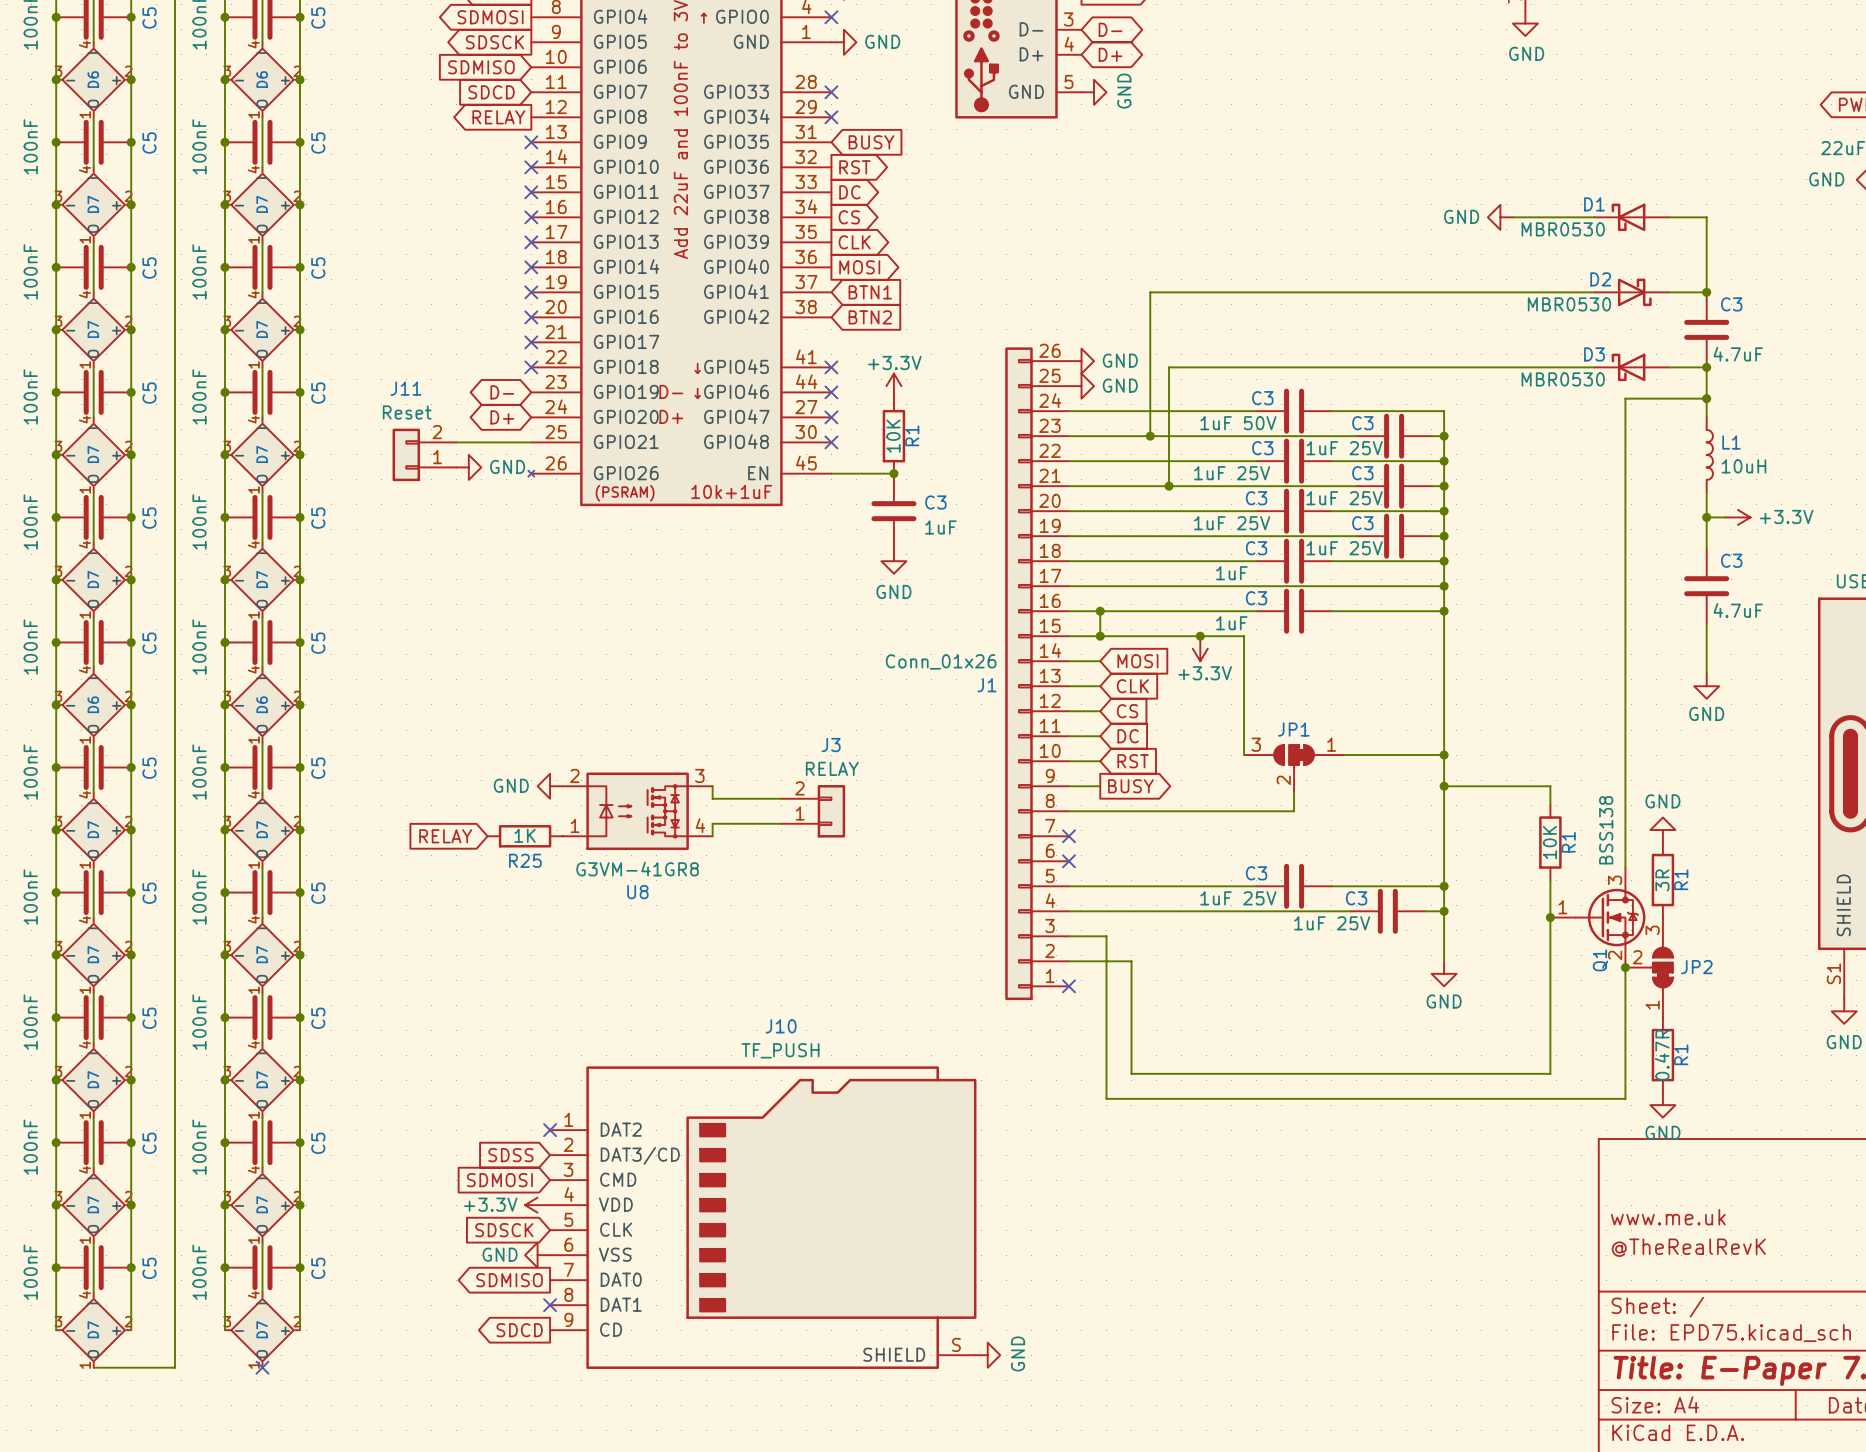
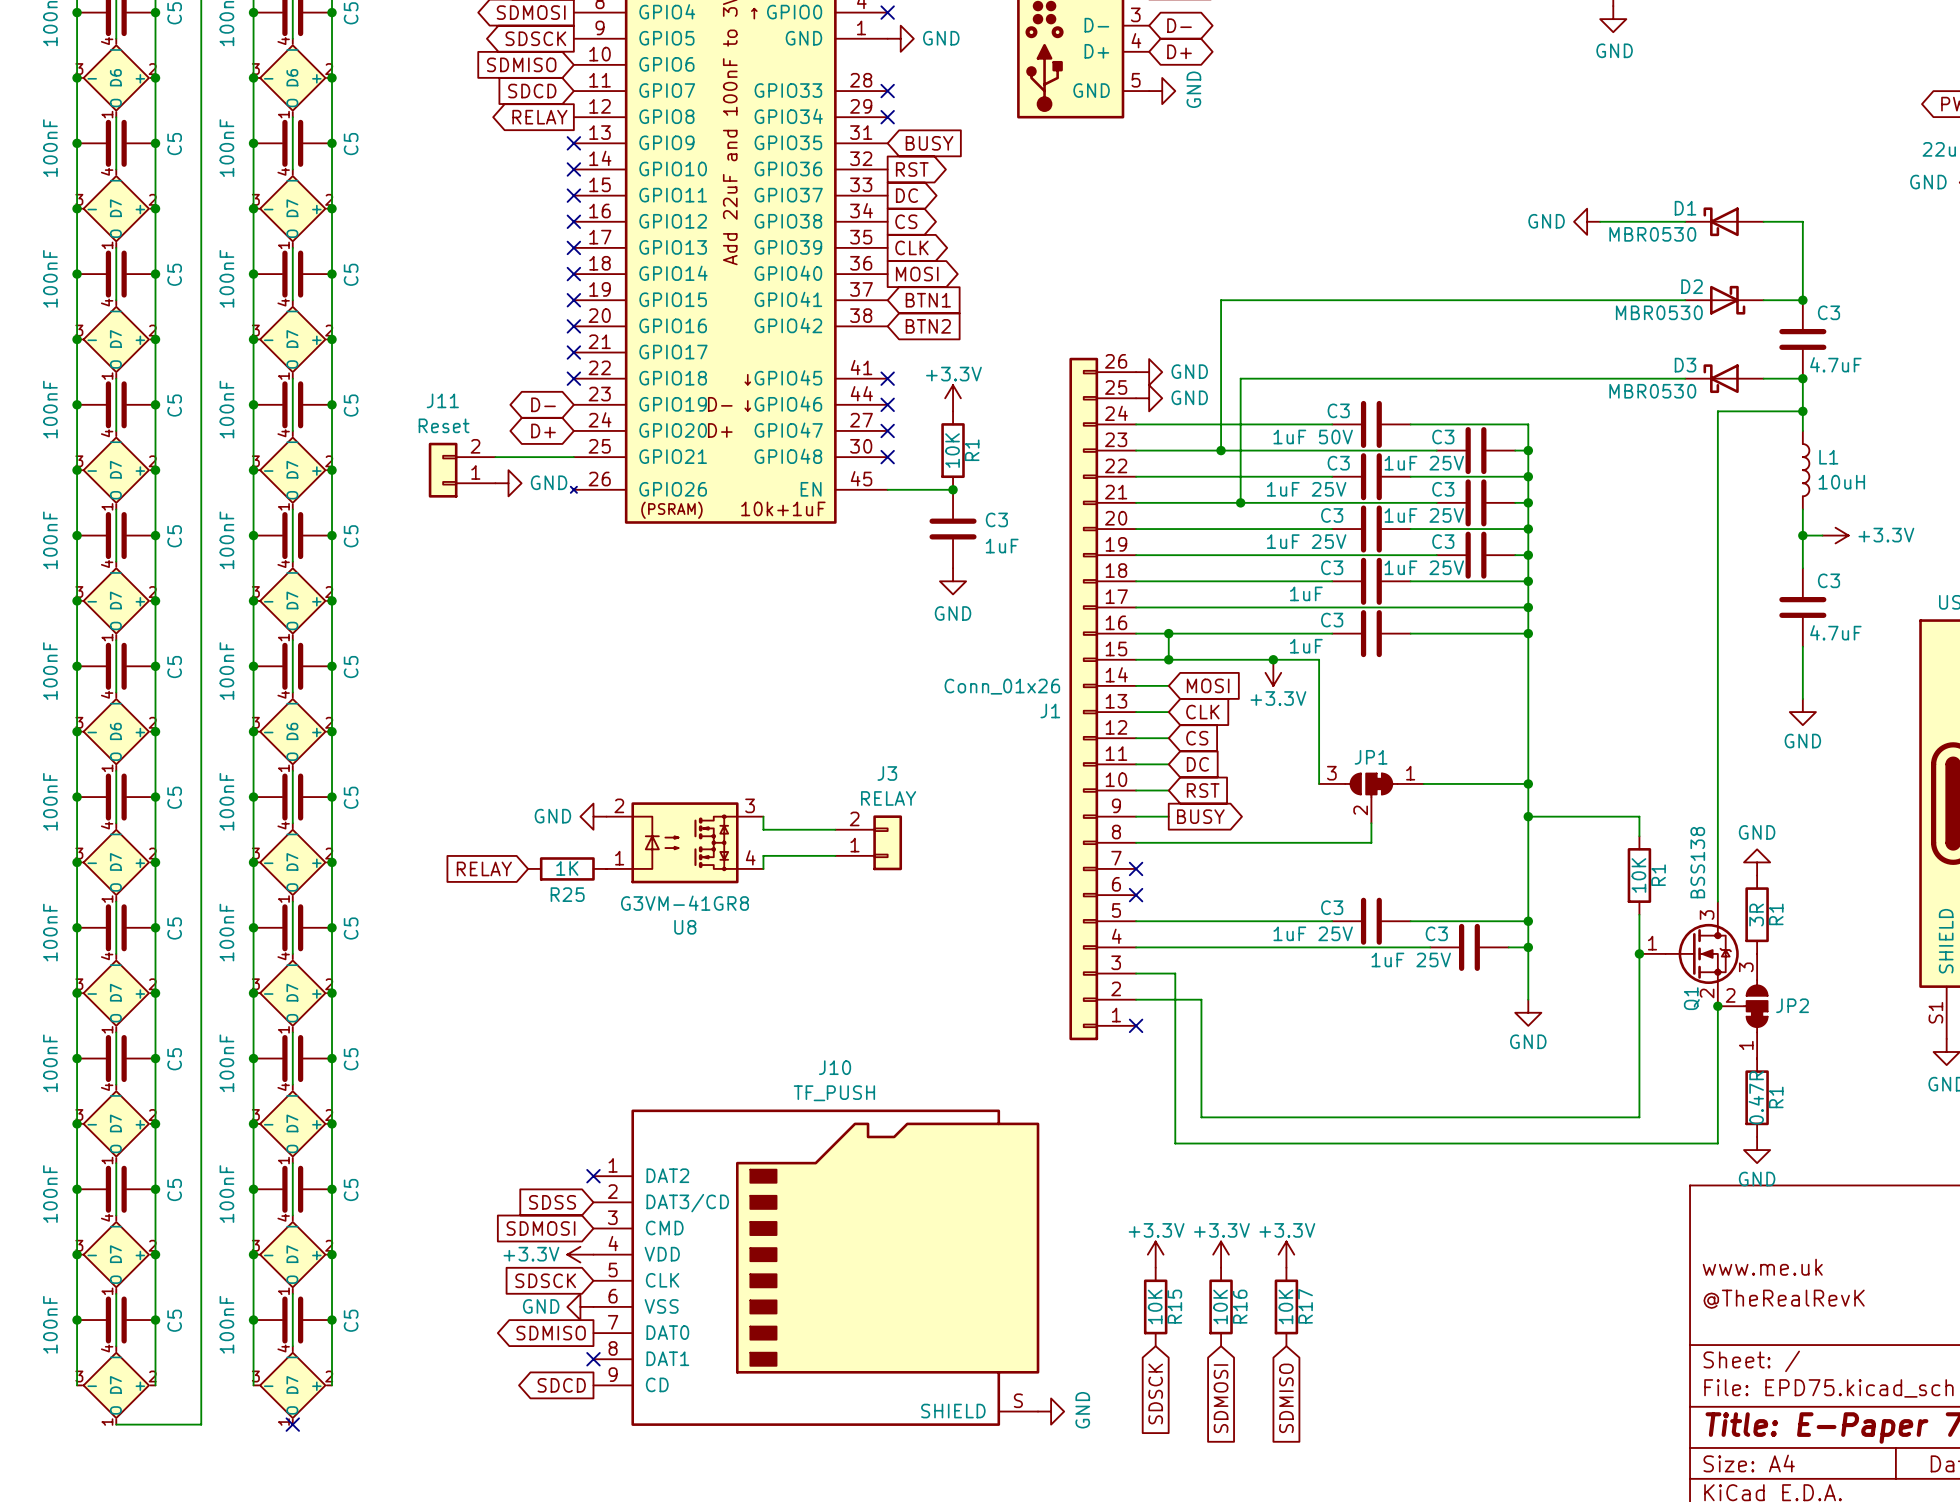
power symbol: none -> +3.3V (1155, 1254)
power symbol: none -> +3.3V (1221, 1254)
power symbol: none -> +3.3V (1286, 1254)
R15: none -> 10K (1155, 1306)
R16: none -> 10K (1221, 1306)
R17: none -> 10K (1286, 1306)
global label: none -> SDSCK (1155, 1393)
global label: none -> SDMOSI (1221, 1398)
global label: none -> SDMISO (1286, 1398)

